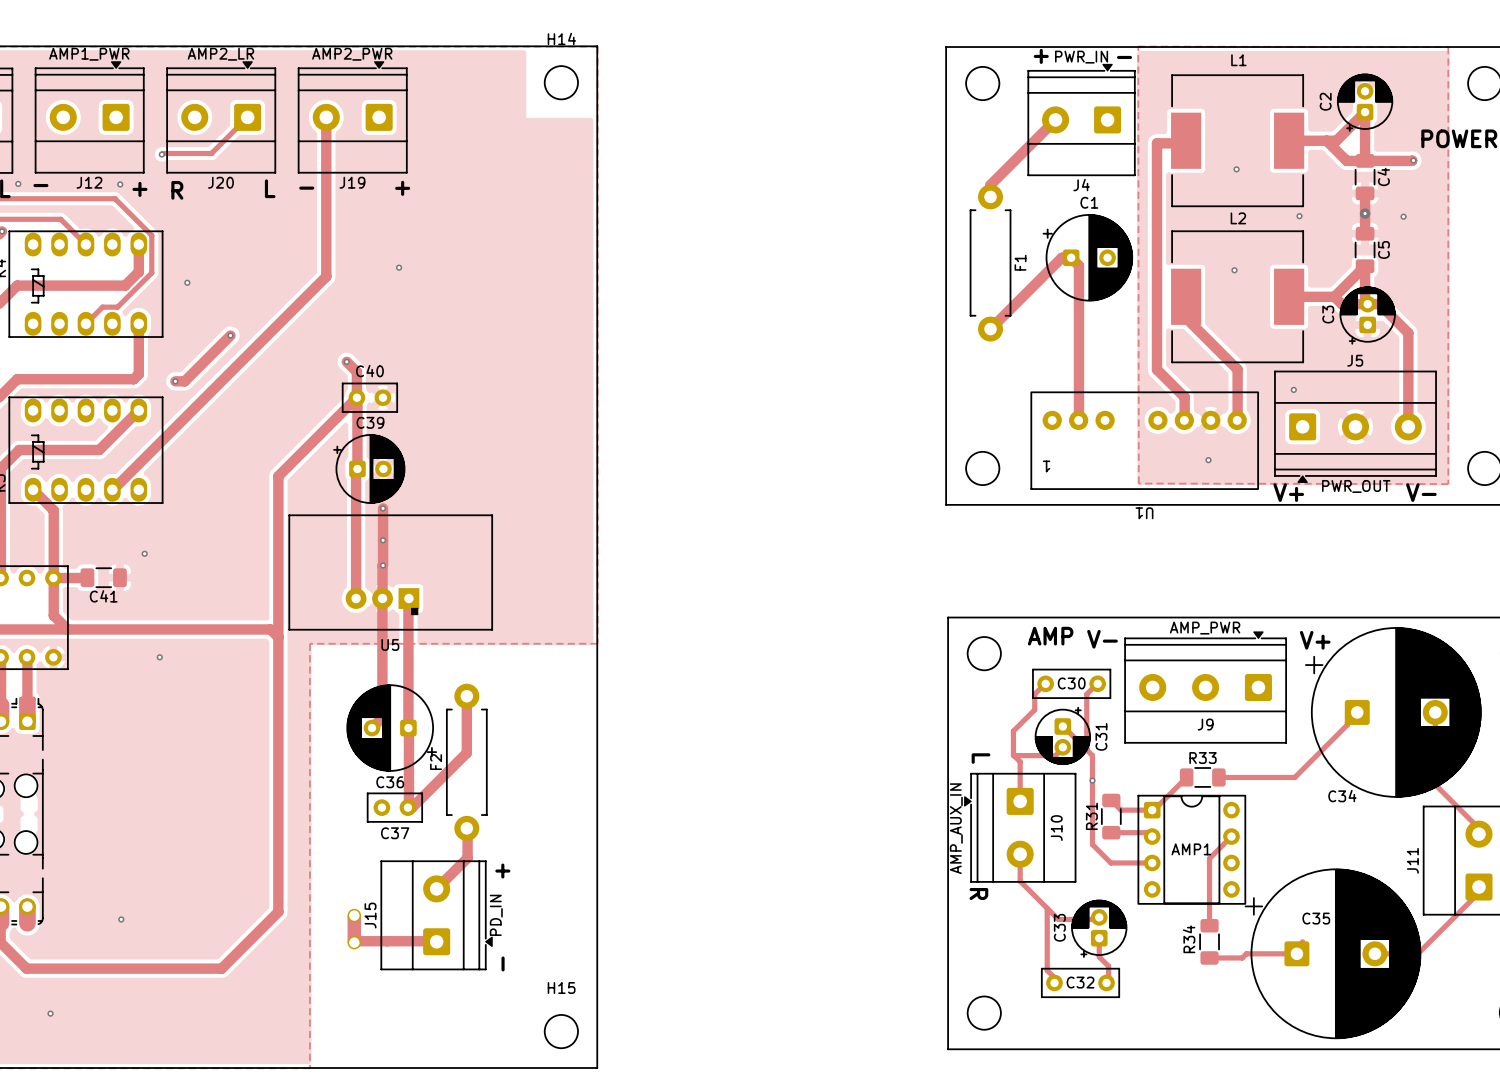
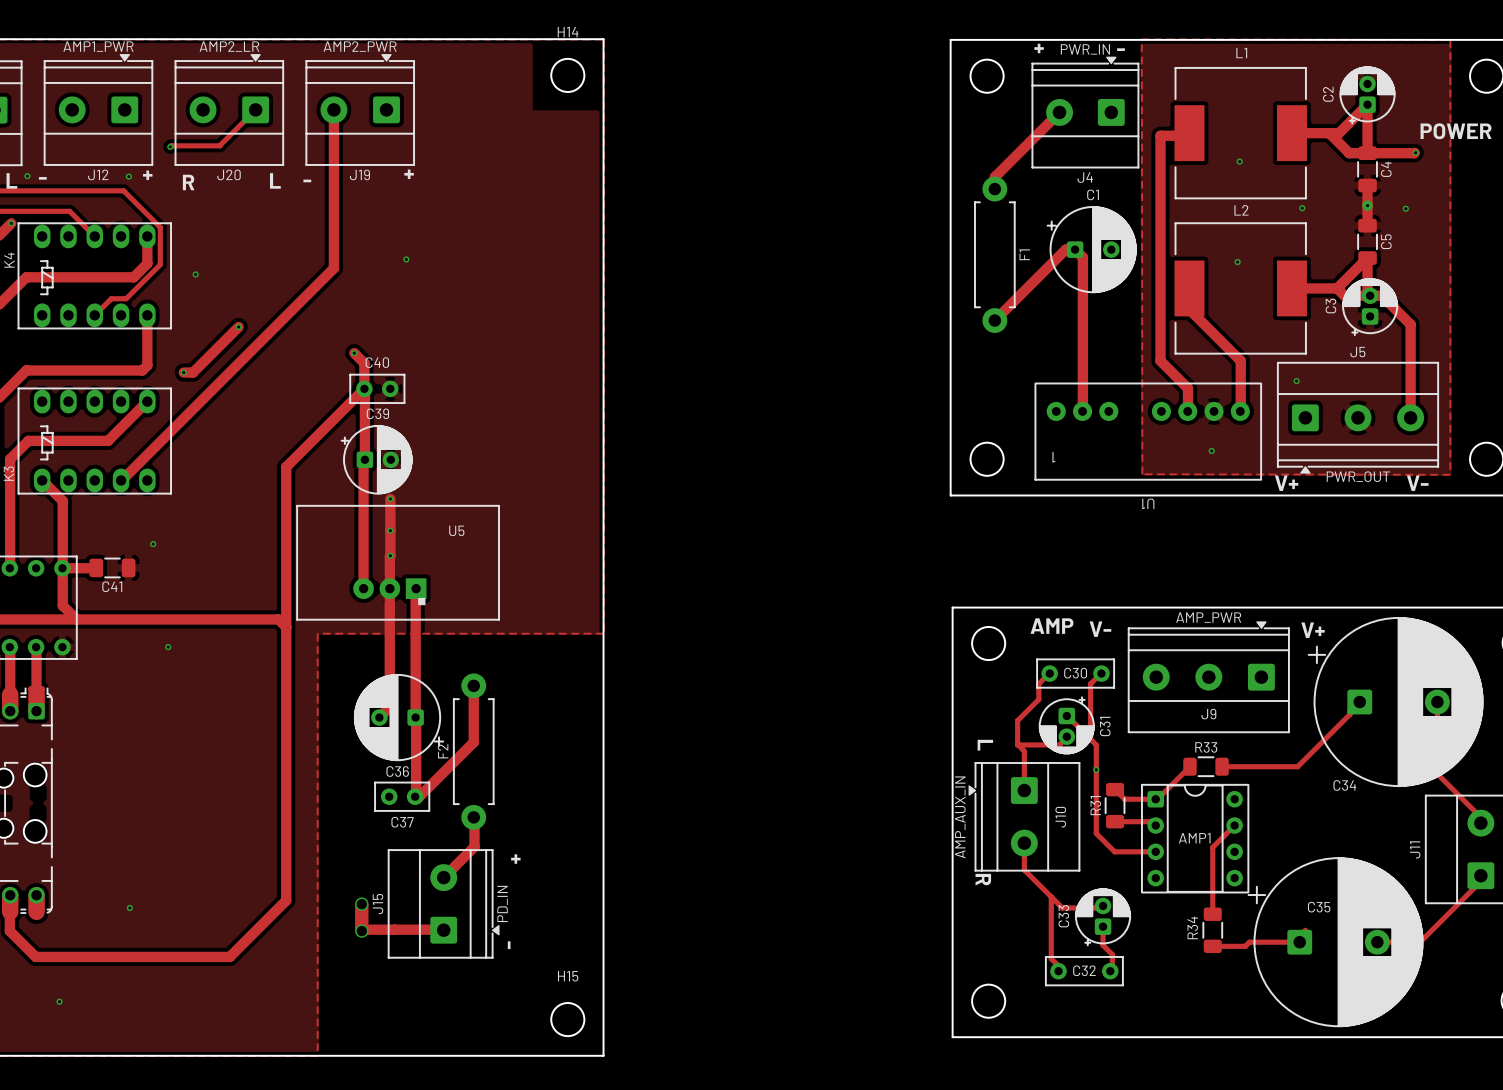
U5 name position: U5 (390, 644) -> U5 (456, 530)

